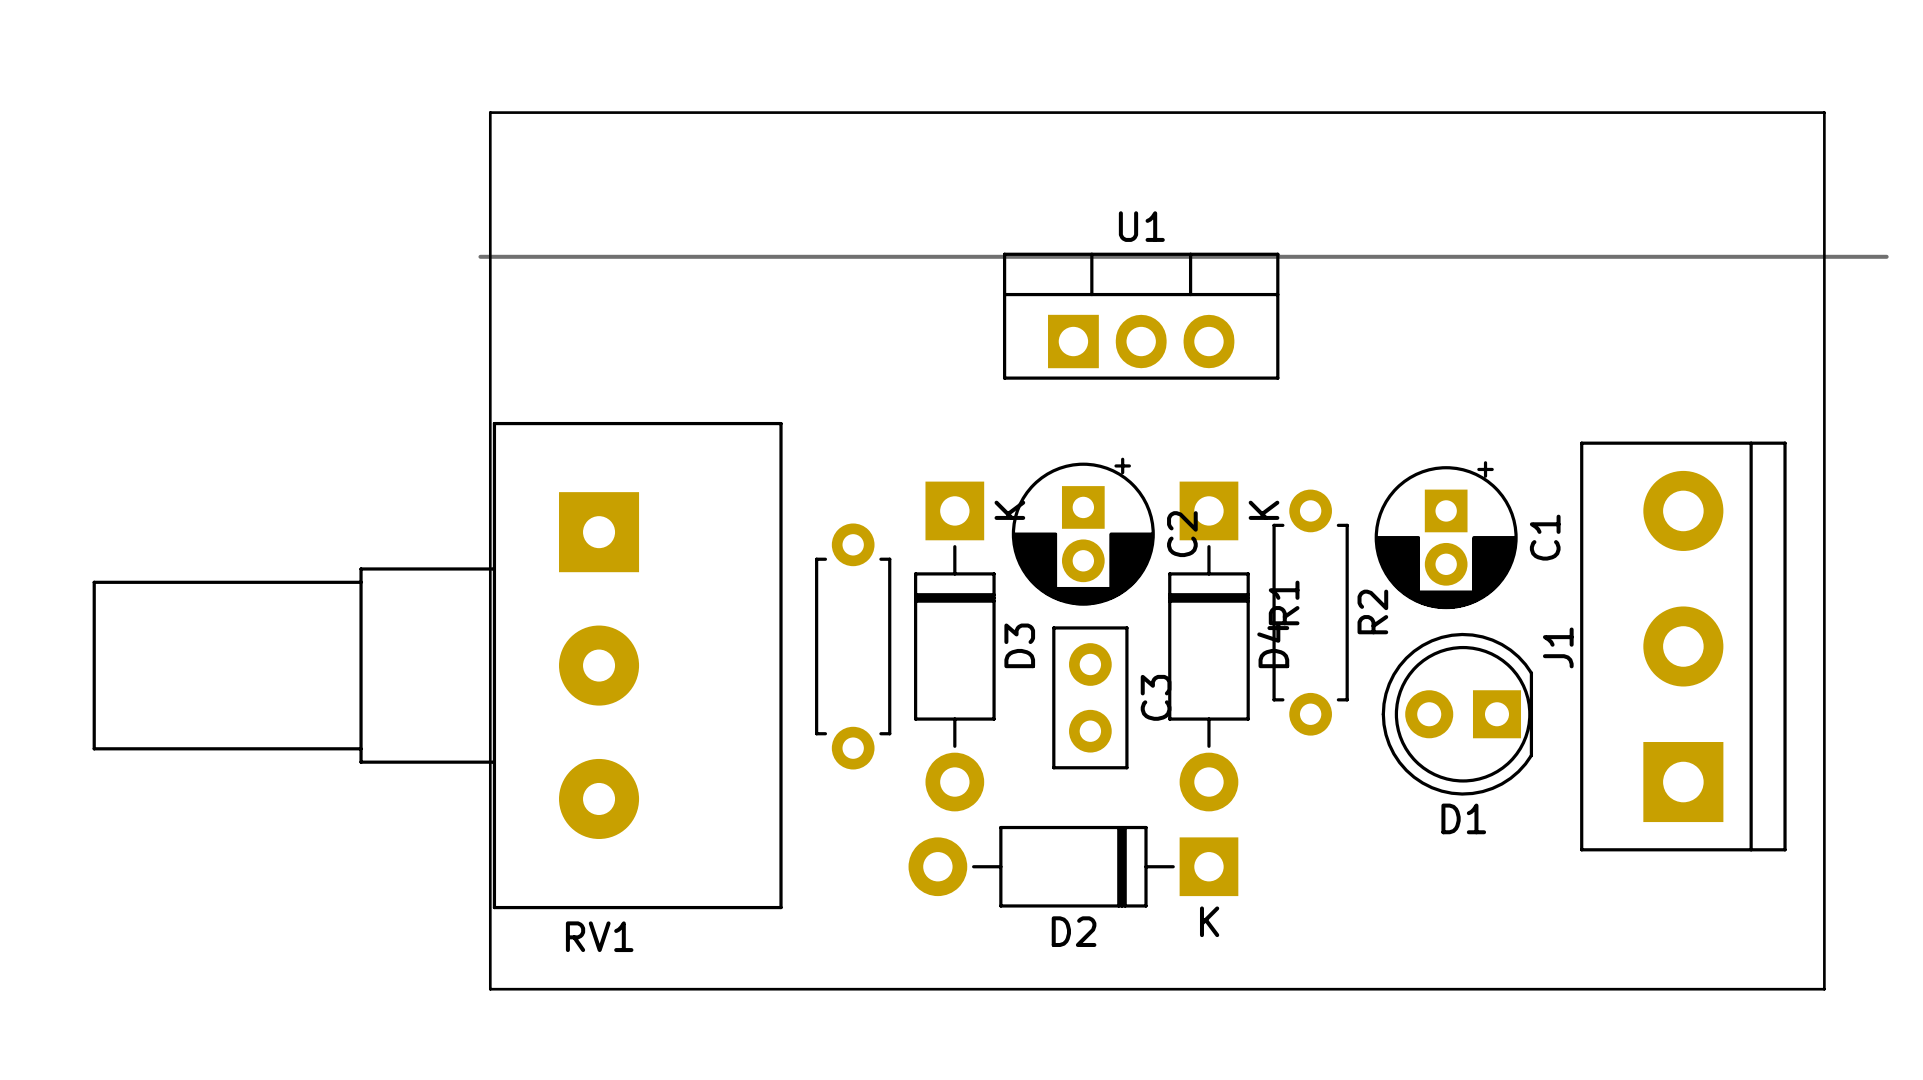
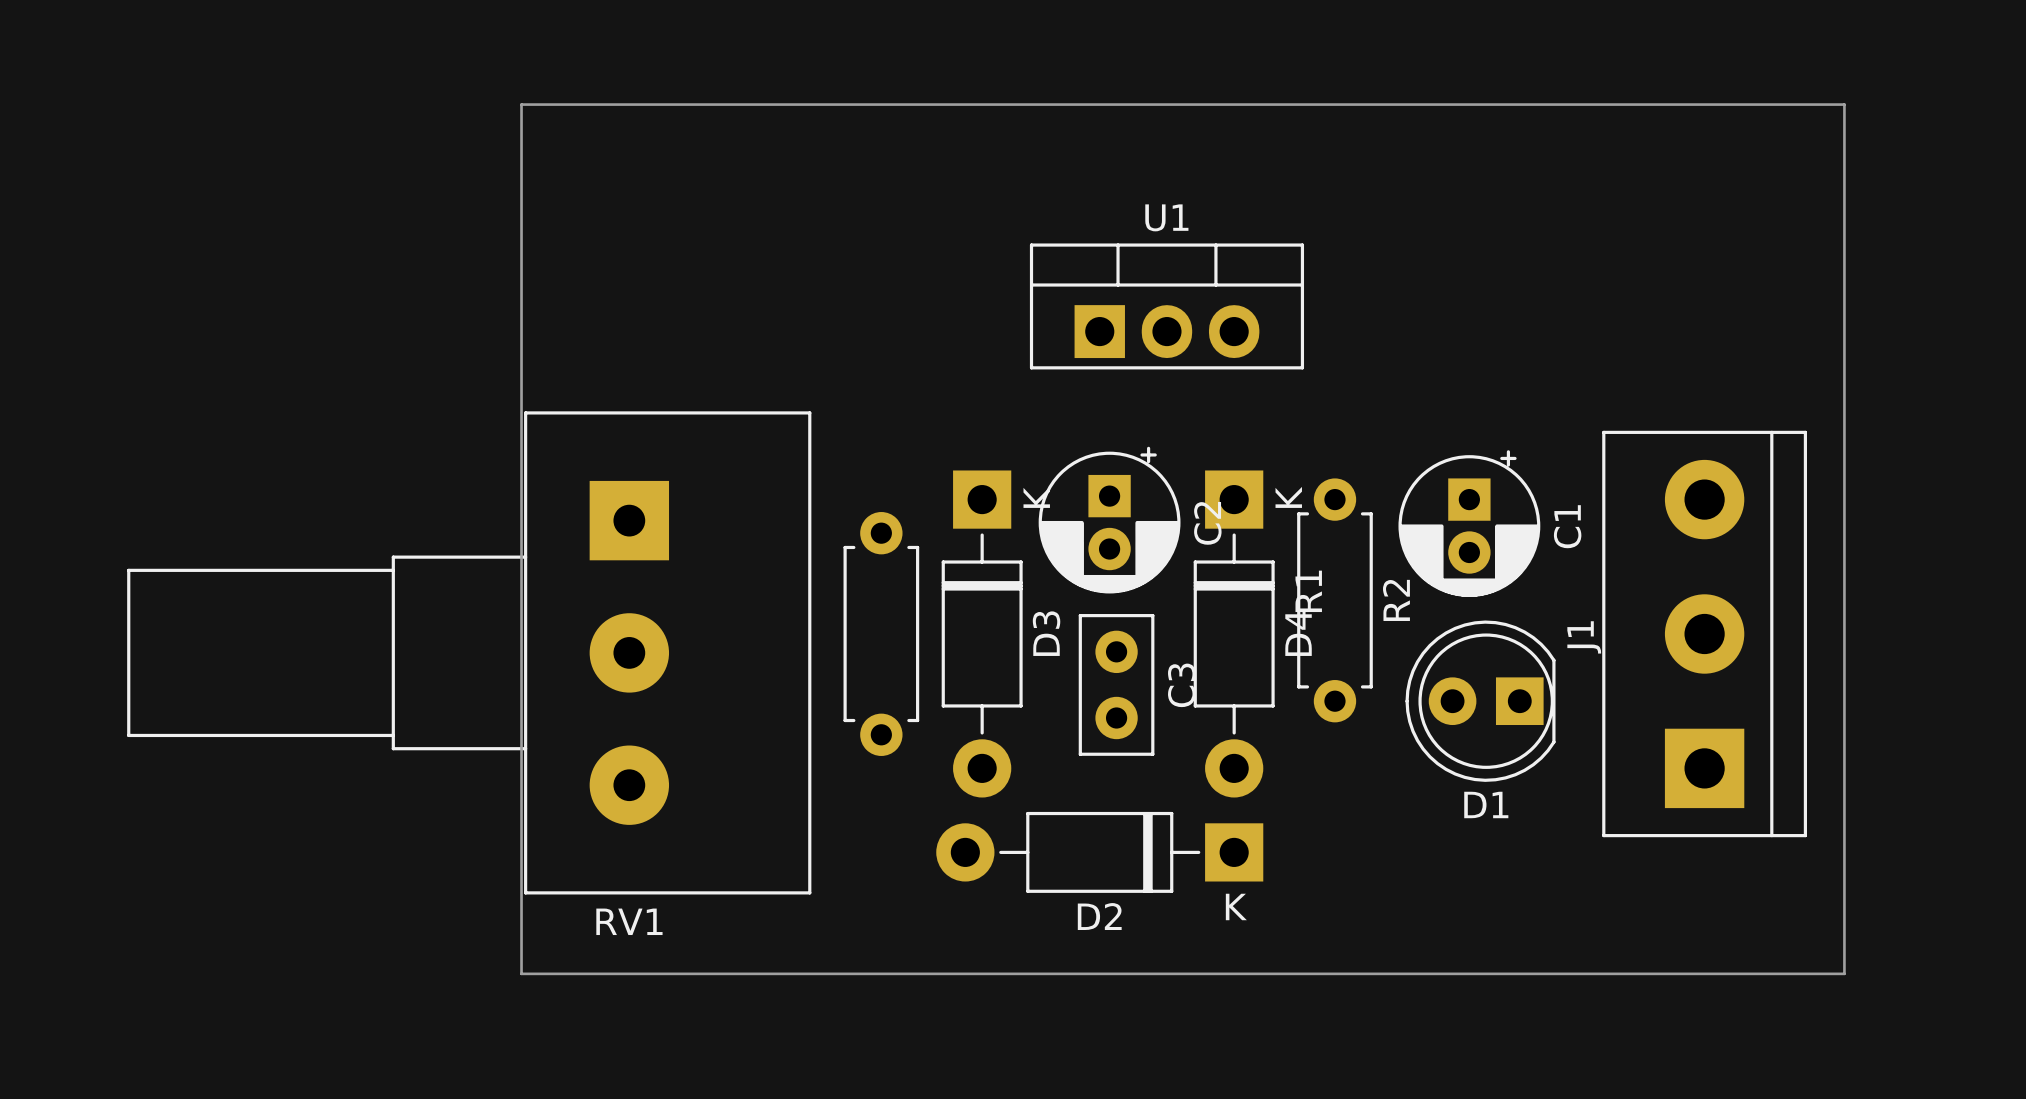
line: (480, 256) (1886, 256) -> none

